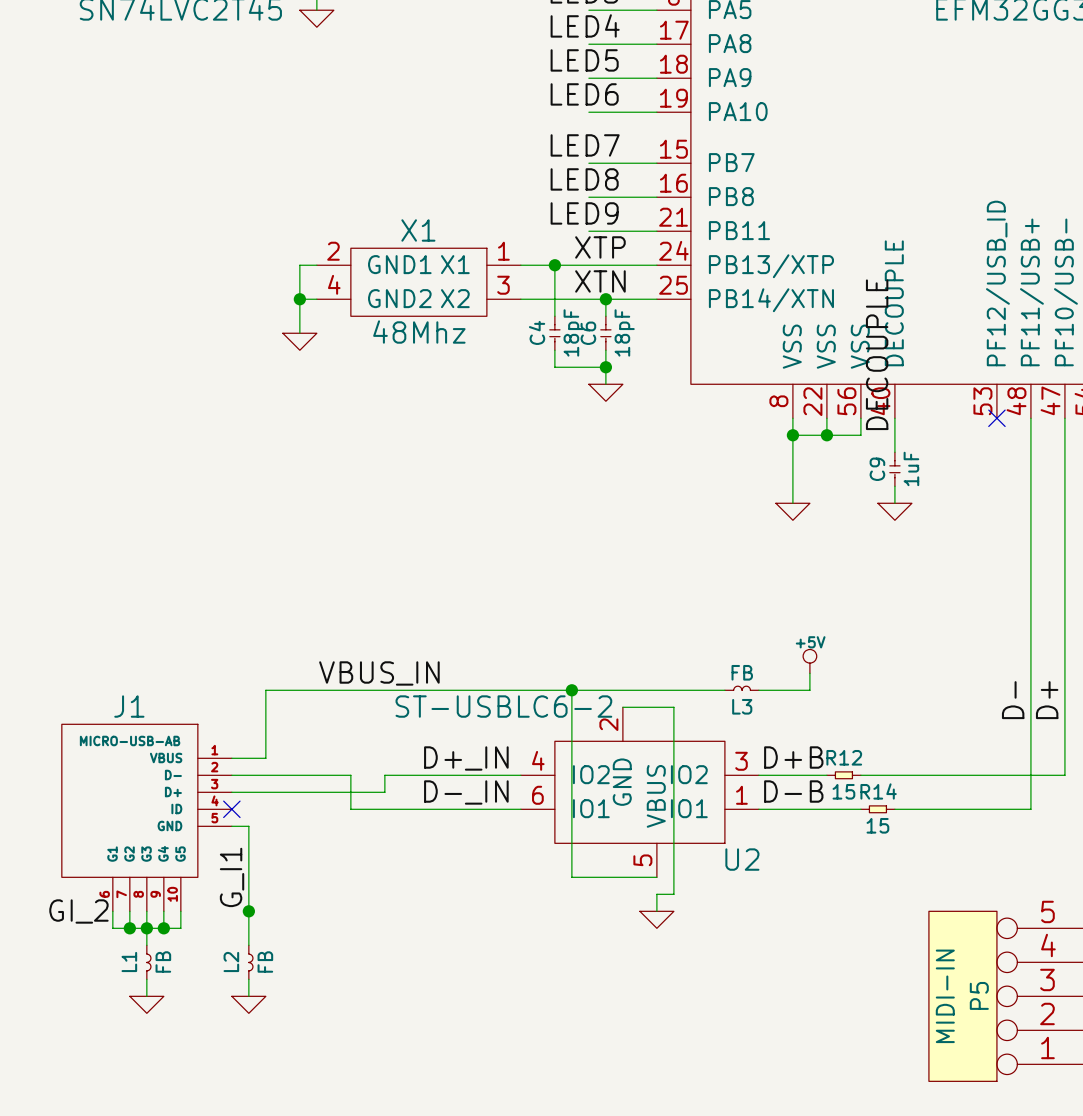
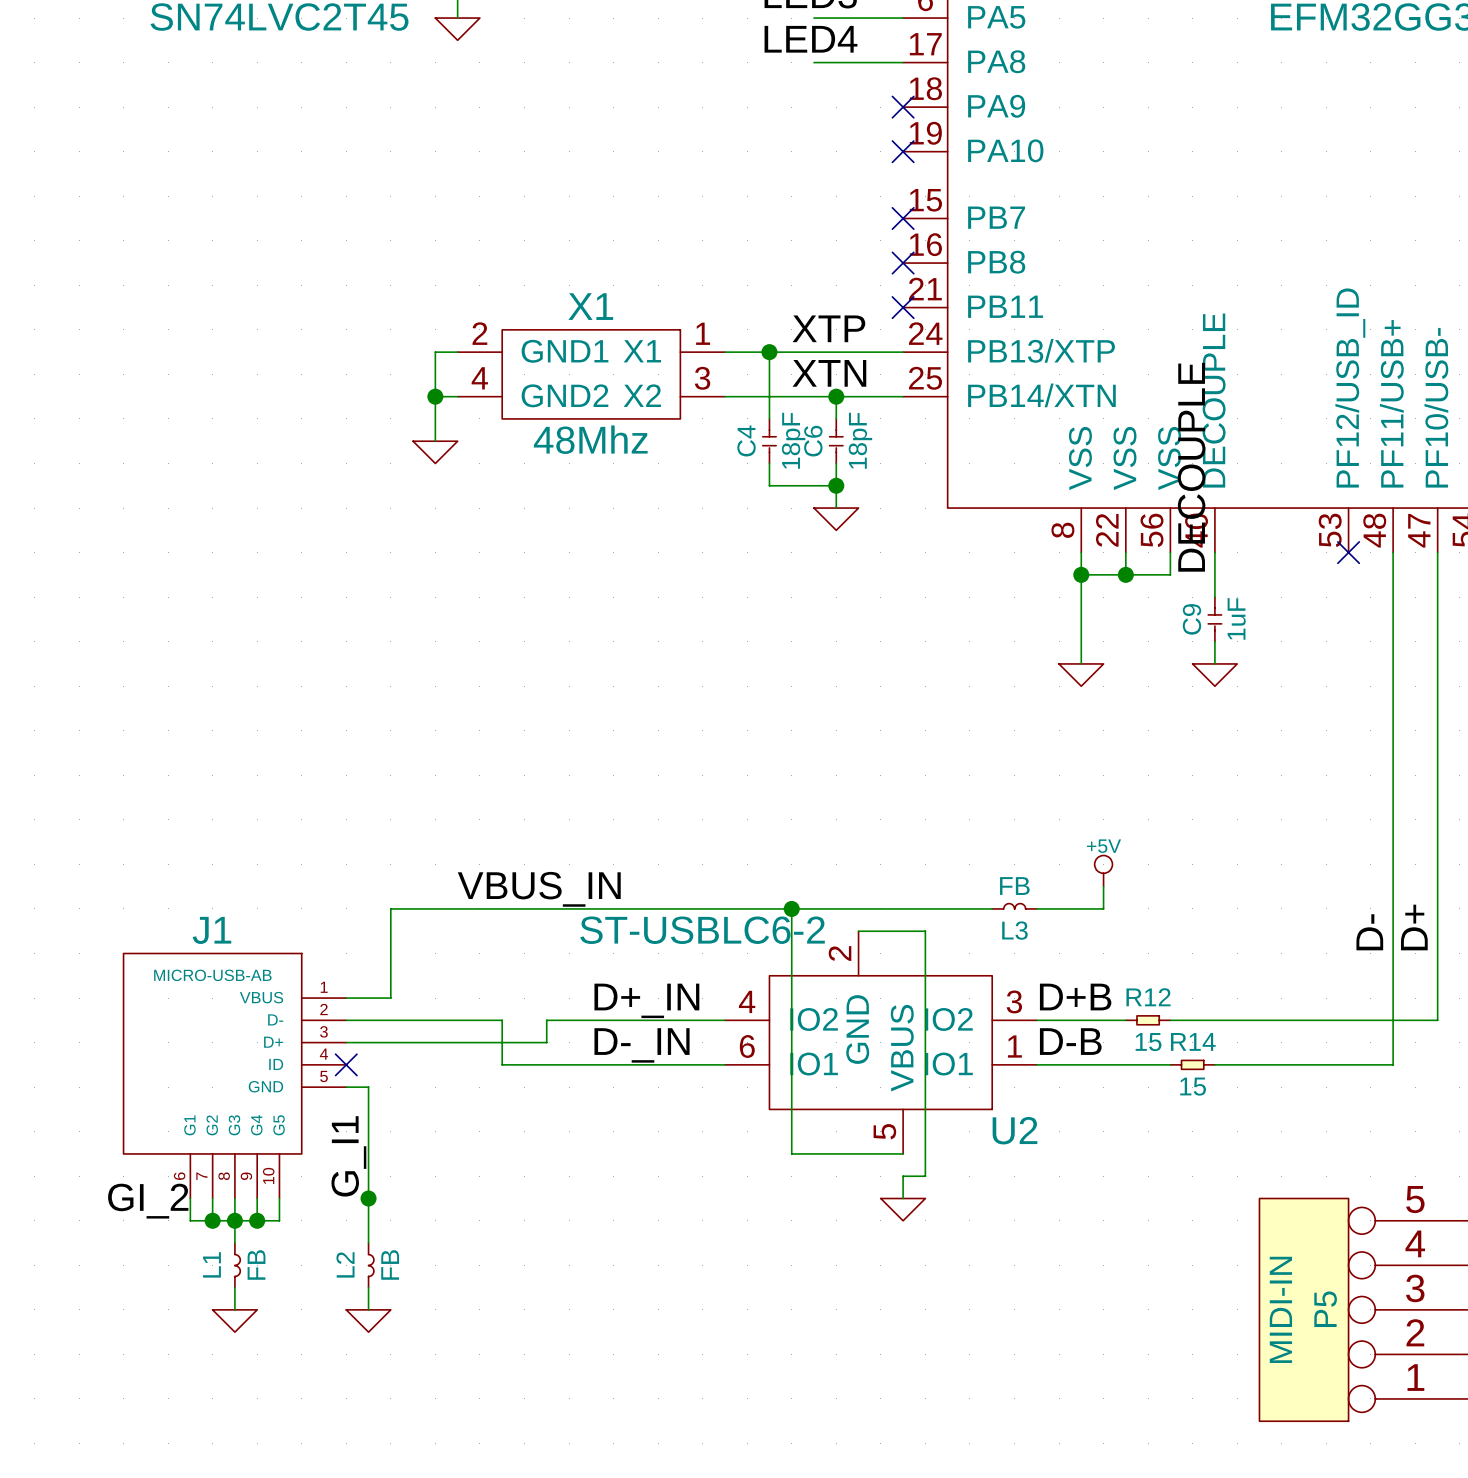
label: LED5 (584, 60) -> none
wire: (588, 78) (656, 78) -> none
no-connect mark: none -> (903, 107)
label: LED6 (584, 94) -> none
wire: (588, 112) (656, 112) -> none
no-connect mark: none -> (903, 151)
label: LED7 (585, 145) -> none
wire: (588, 163) (656, 163) -> none
no-connect mark: none -> (903, 218)
label: LED8 (584, 179) -> none
wire: (588, 197) (656, 197) -> none
no-connect mark: none -> (903, 263)
label: LED9 (584, 213) -> none
wire: (588, 231) (656, 231) -> none
no-connect mark: none -> (903, 307)

